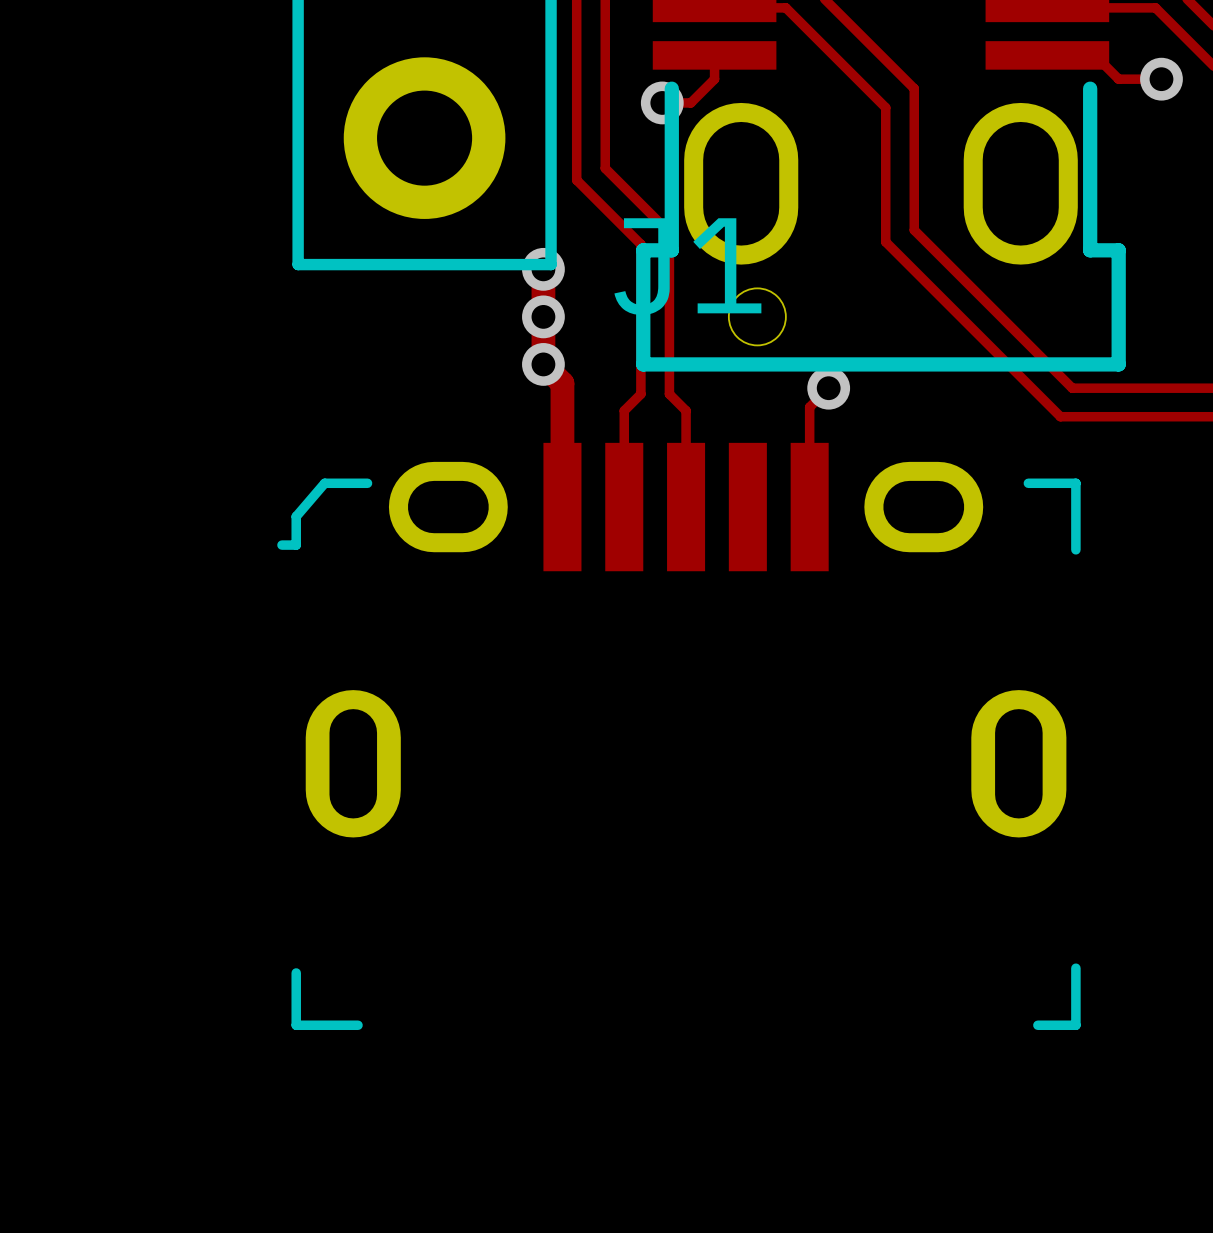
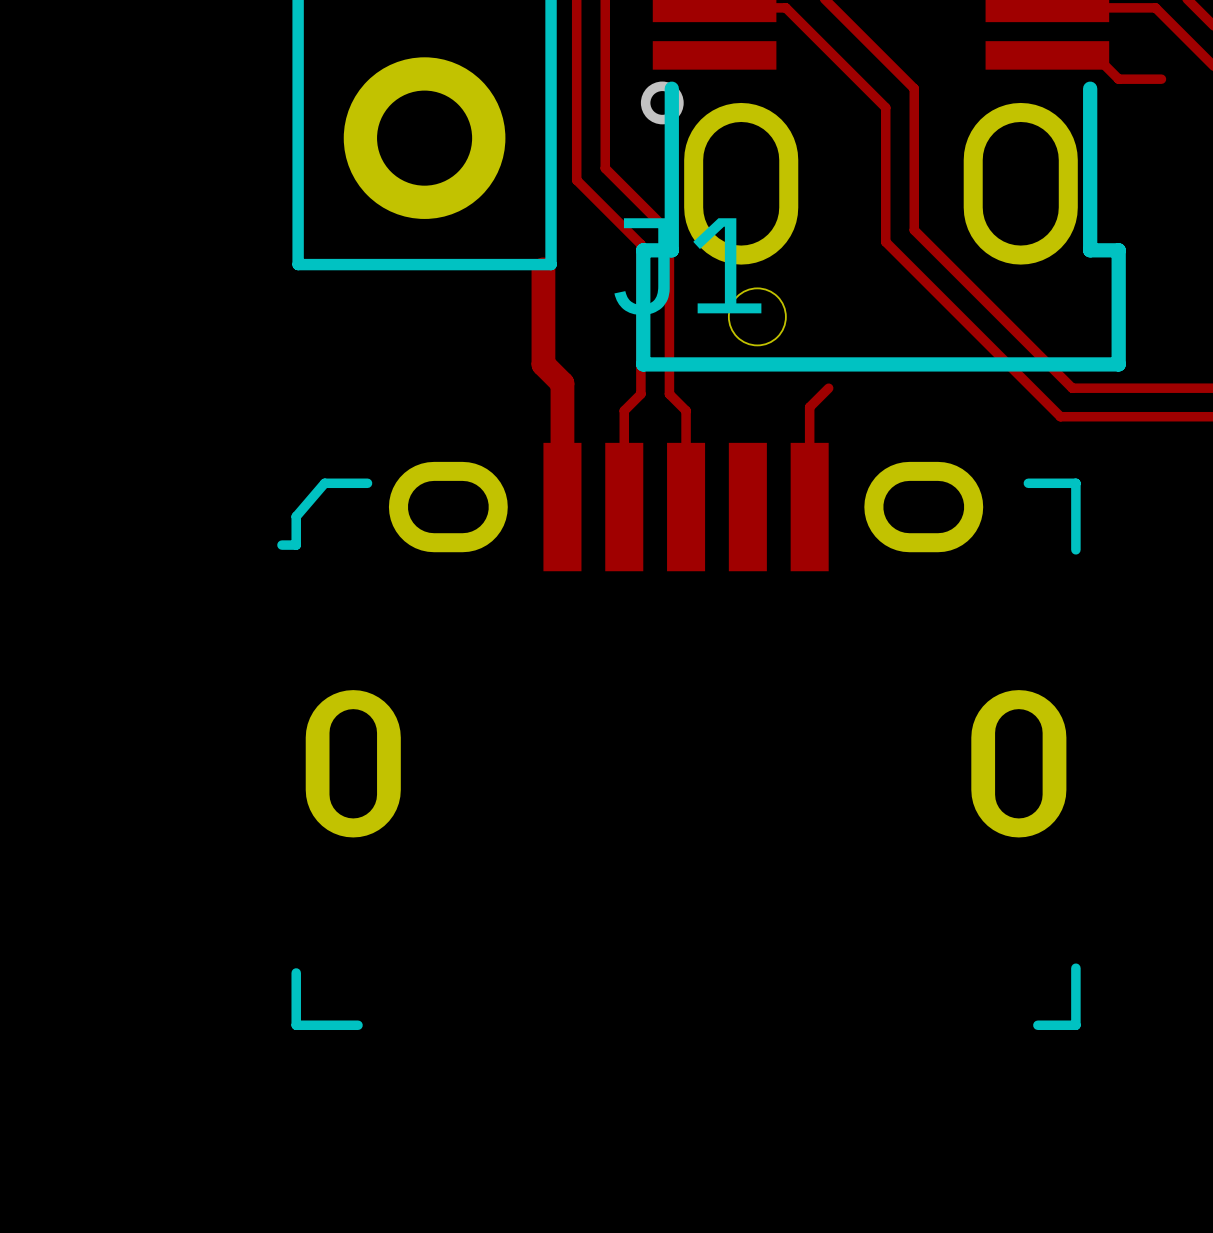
track: (714, 55) (714, 79) (690, 102) (662, 102) -> none
via: (1161, 79) -> none
via: (543, 269) -> none
via: (543, 316) -> none
via: (543, 364) -> none
via: (828, 388) -> none

